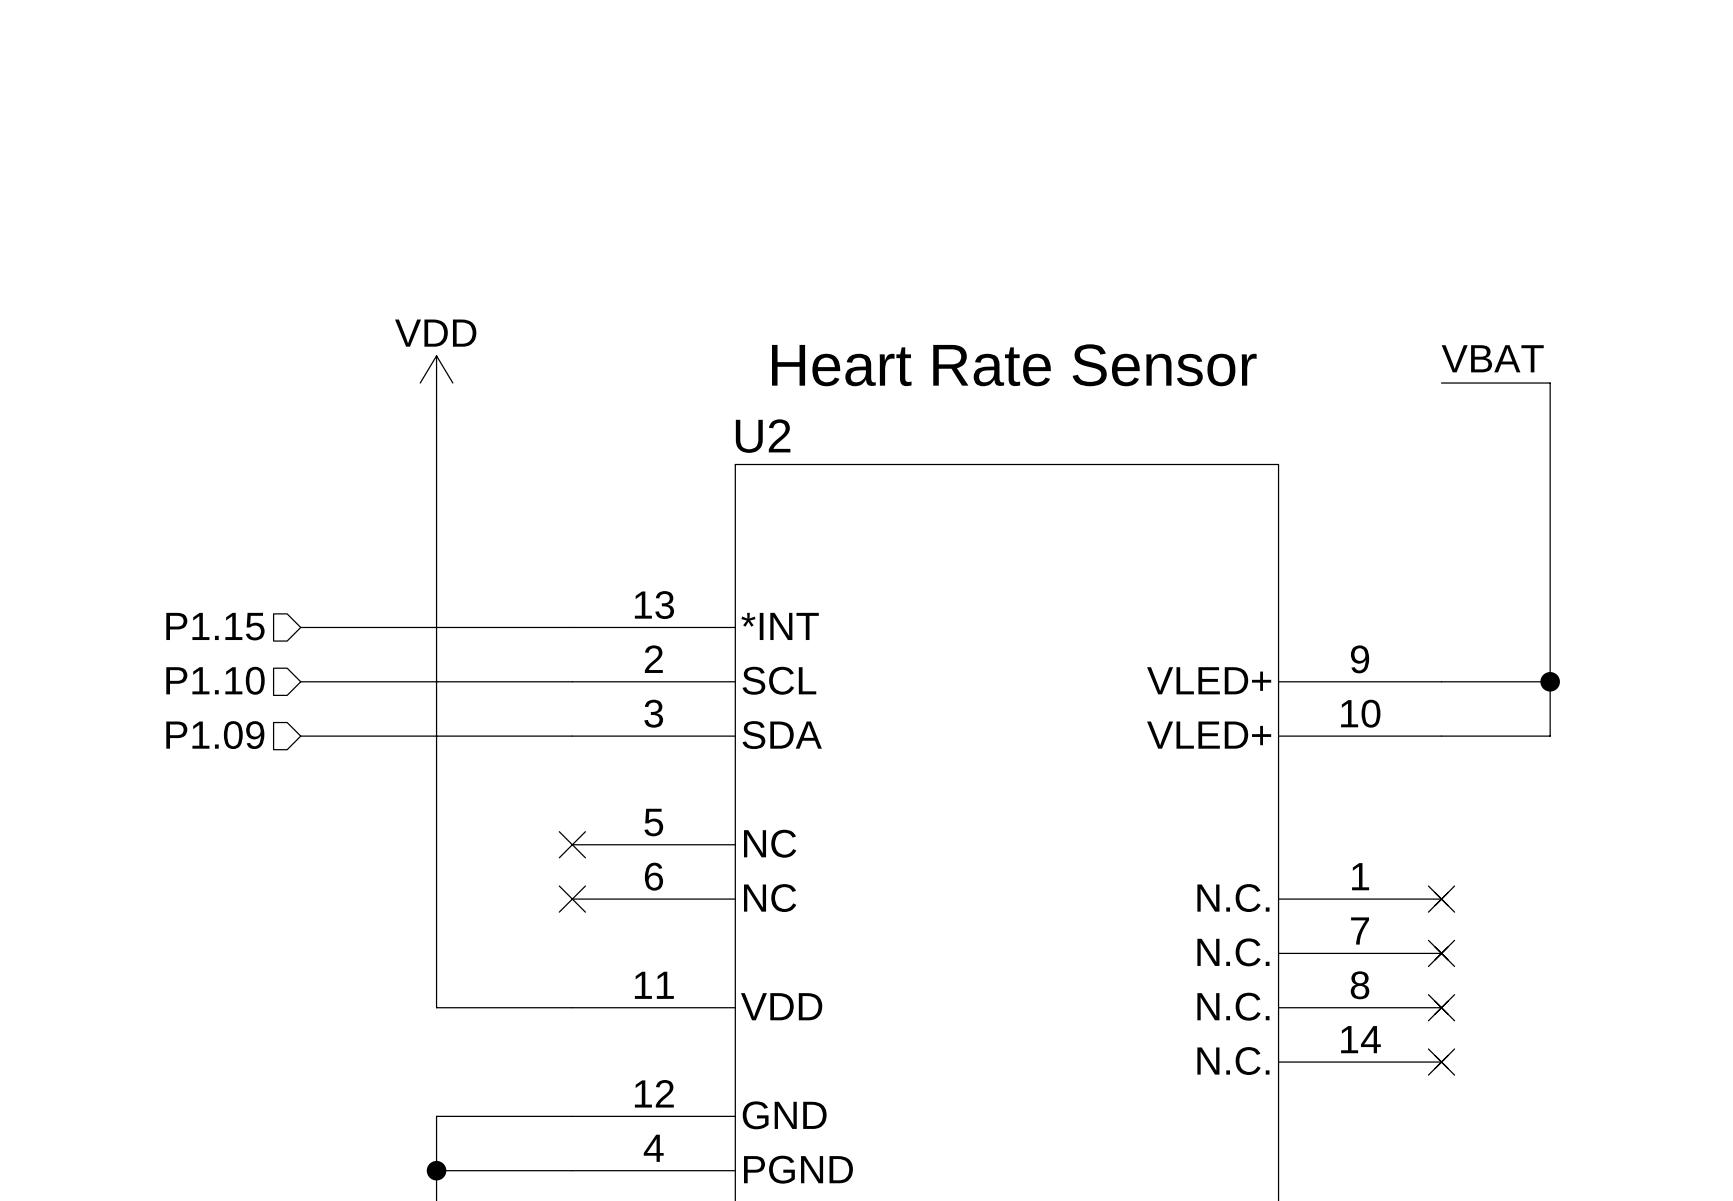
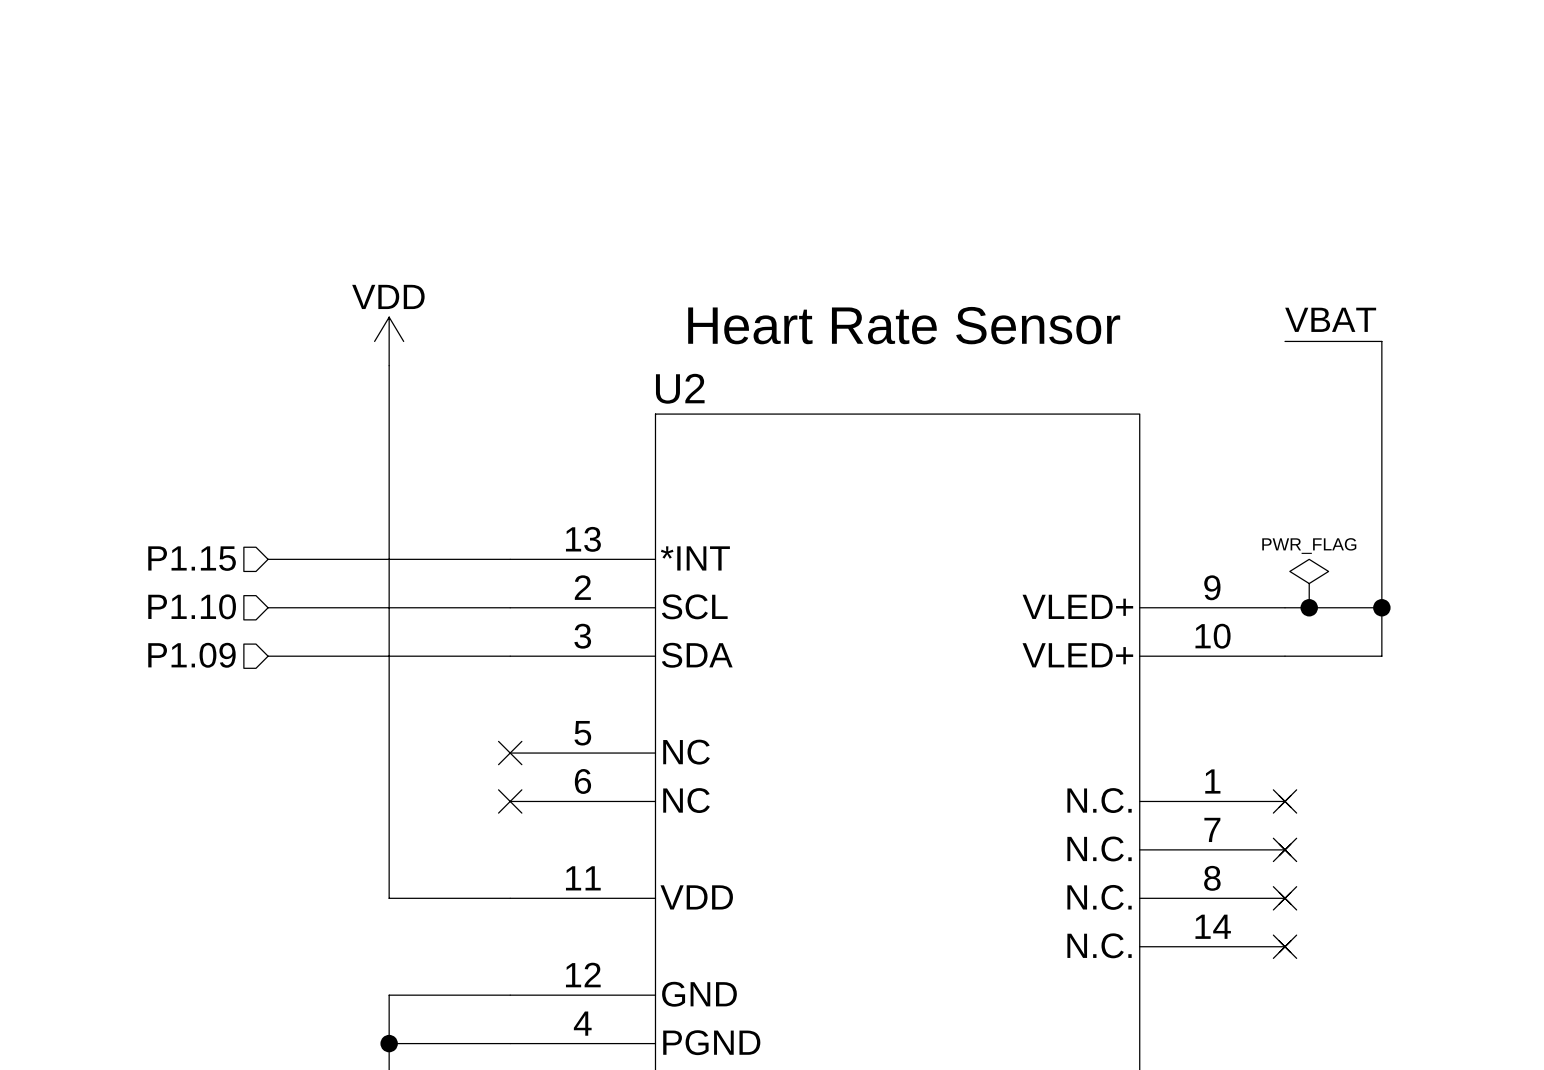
power symbol: none -> PWR_FLAG (1309, 583)
junction: none -> (1309, 607)

